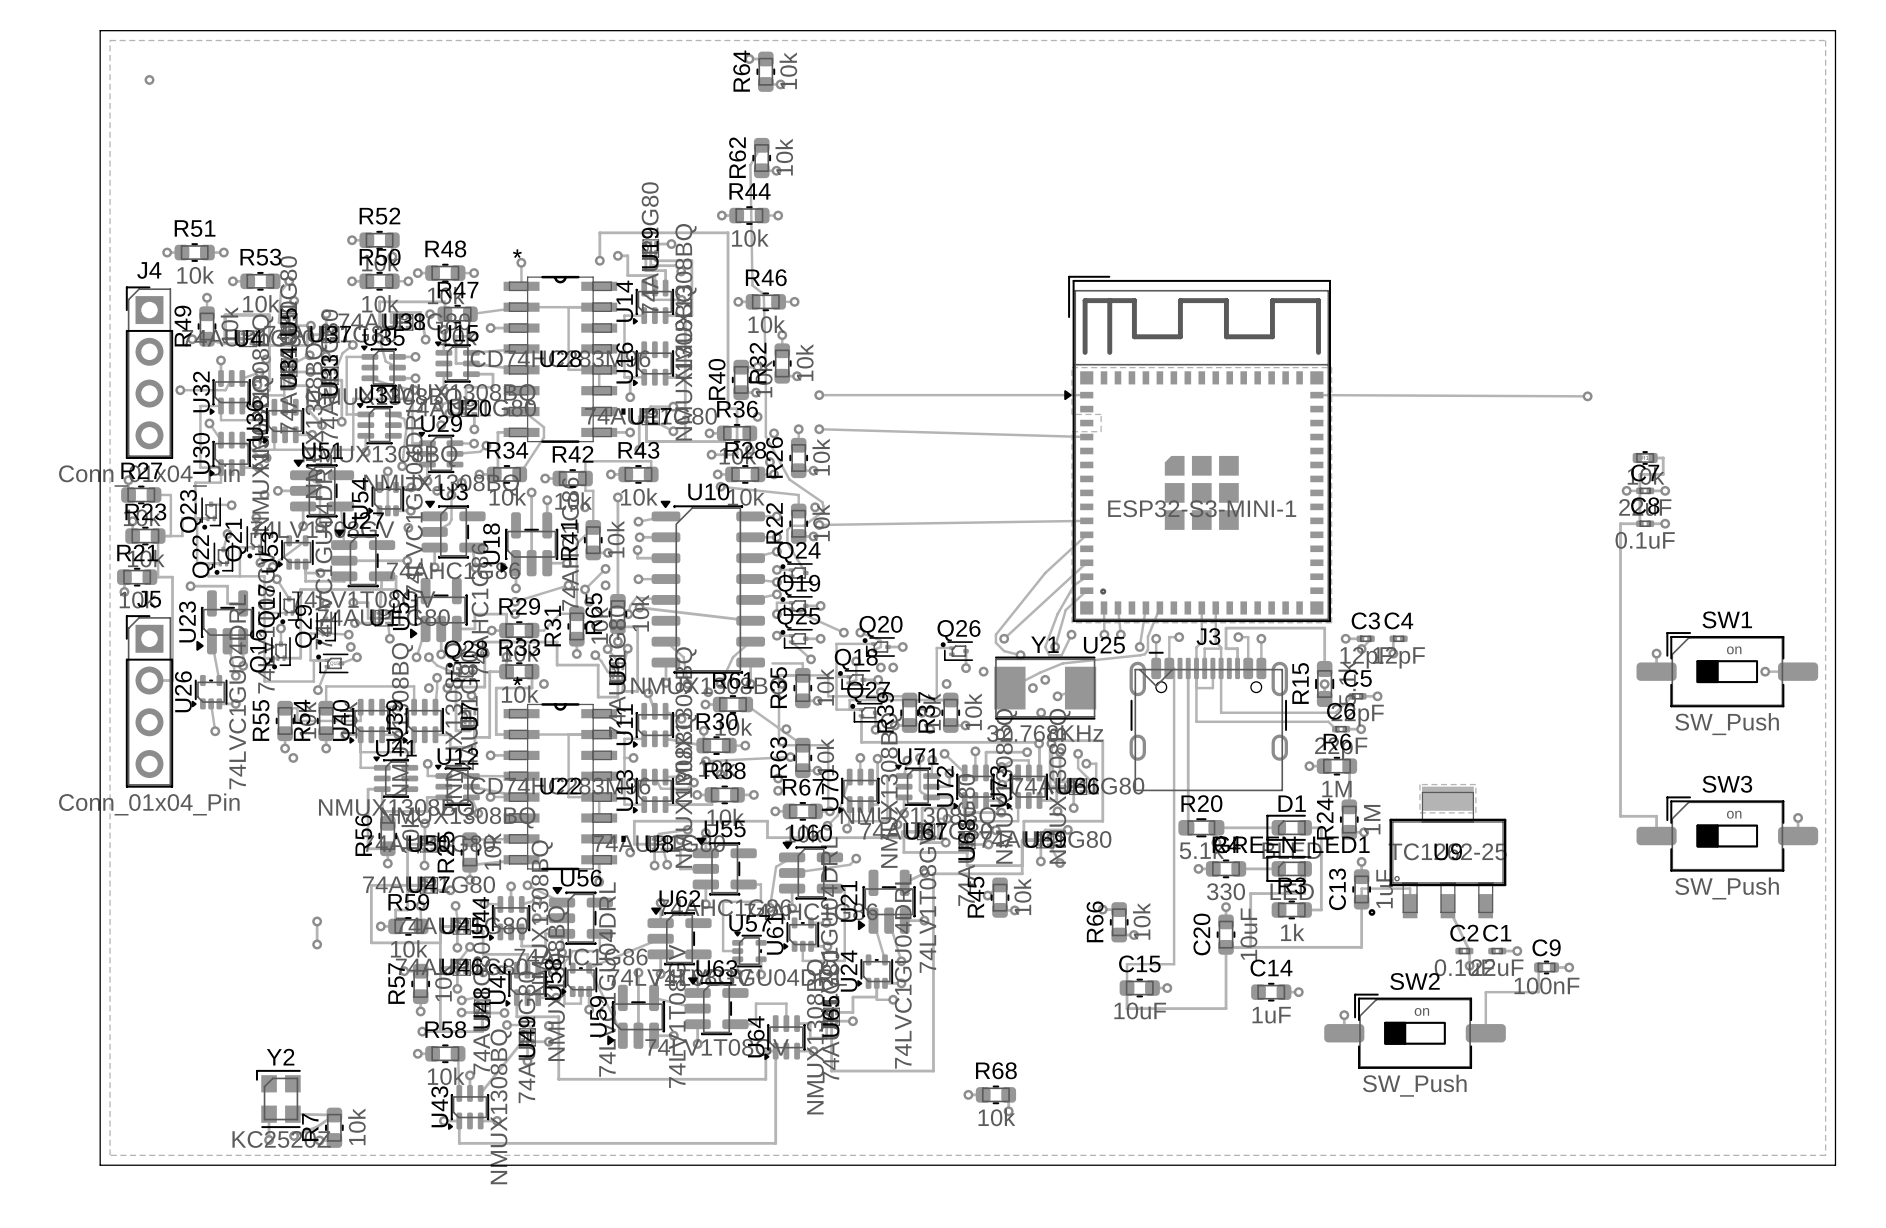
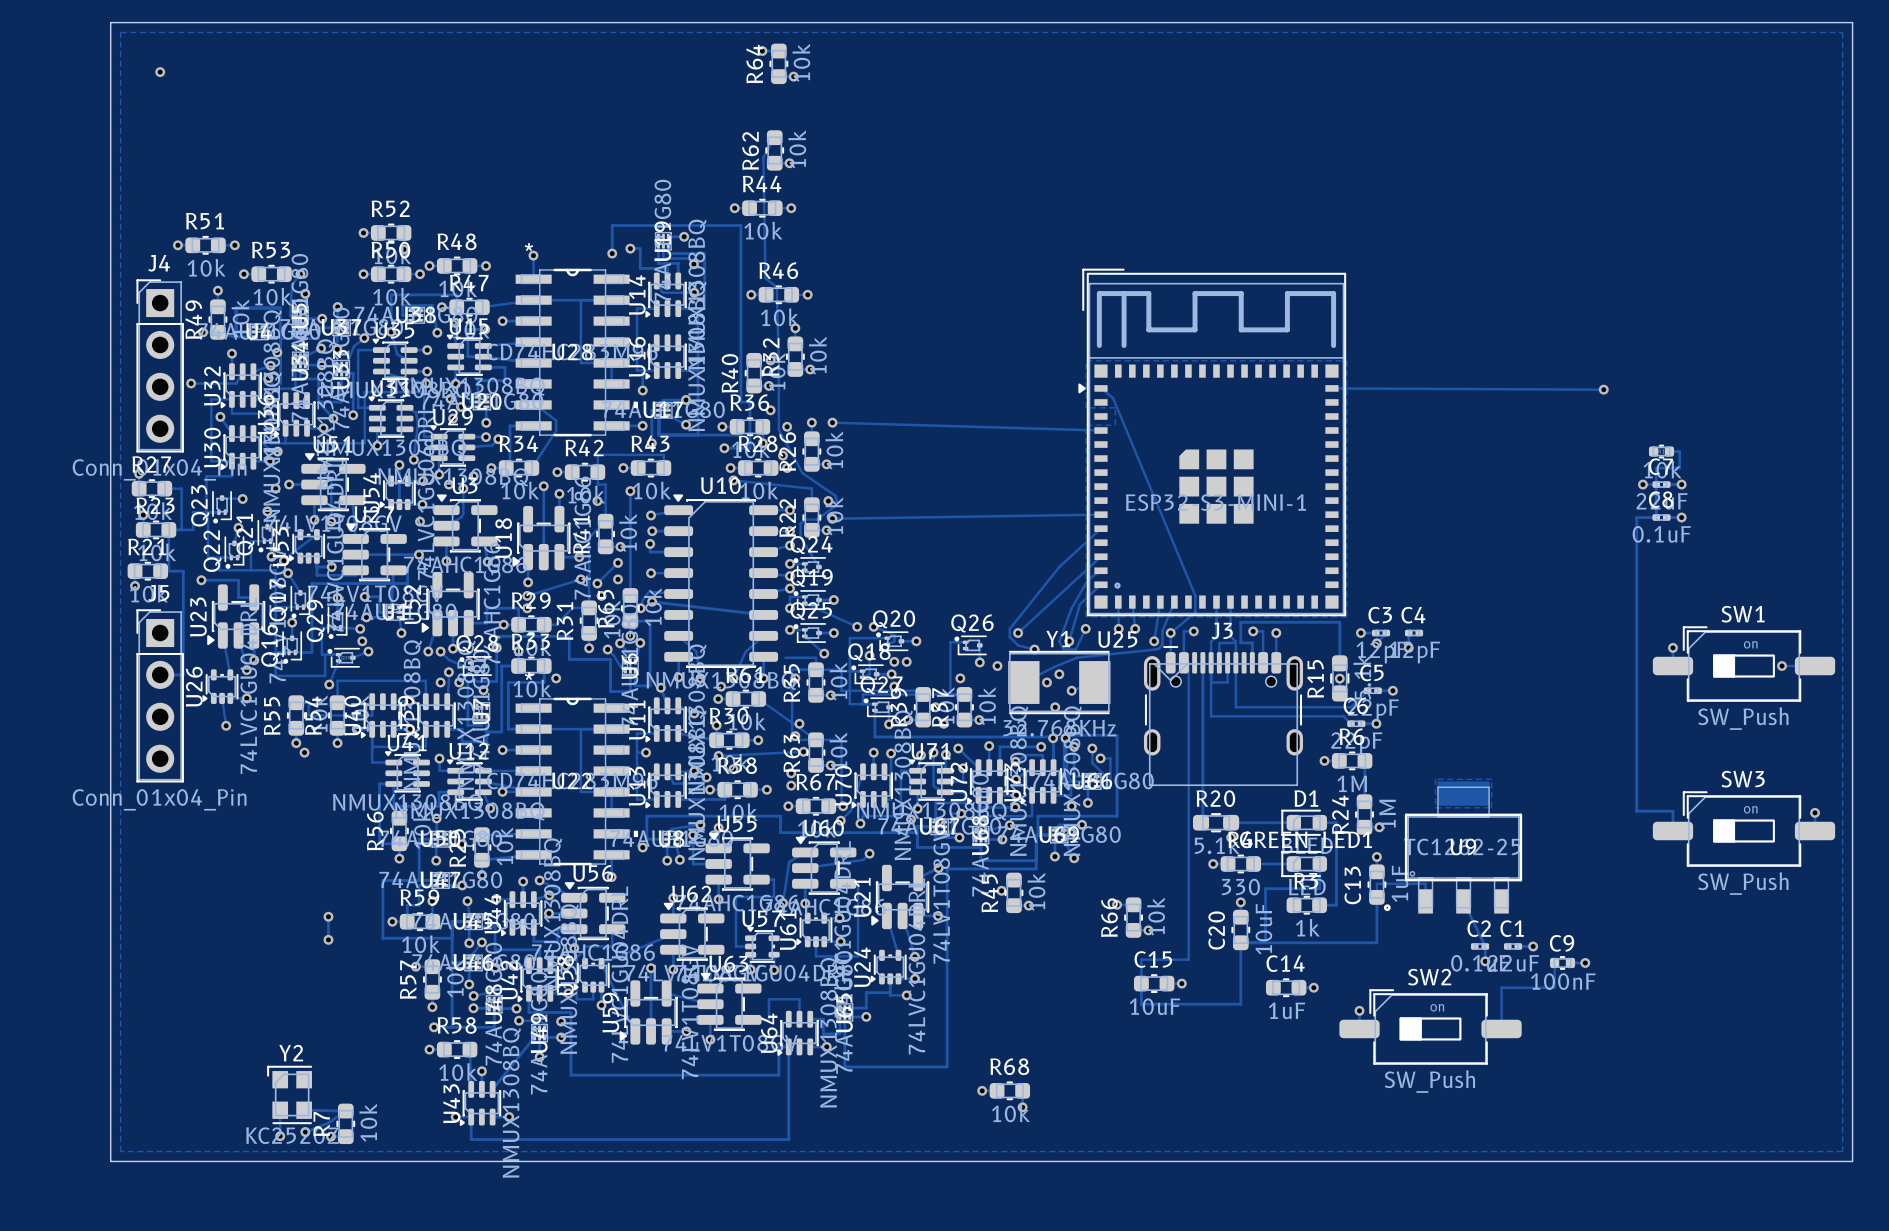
track: (819, 395) (1086, 395) -> (1170, 633) (1195, 612) (1195, 595) (1112, 397) (1100, 388)
via: (819, 395) -> none

